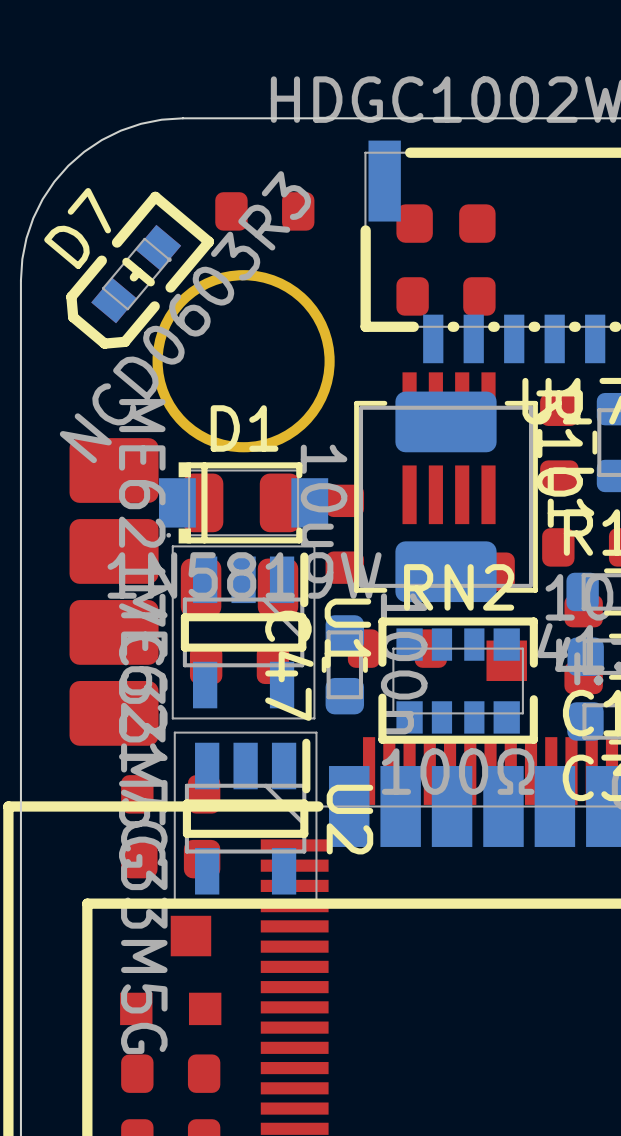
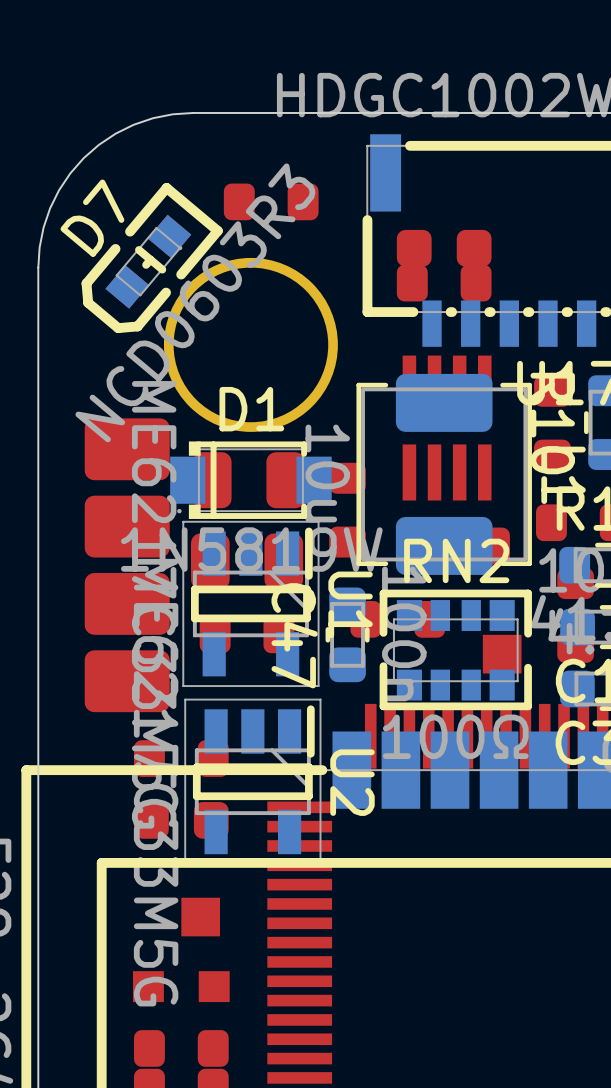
part position: (446, 223) -> (444, 248)
part position: (506, 660) -> (502, 654)
part position: (190, 936) -> (200, 917)
part position: (170, 1008) -> (181, 986)
part position: (170, 1073) -> (181, 1048)

